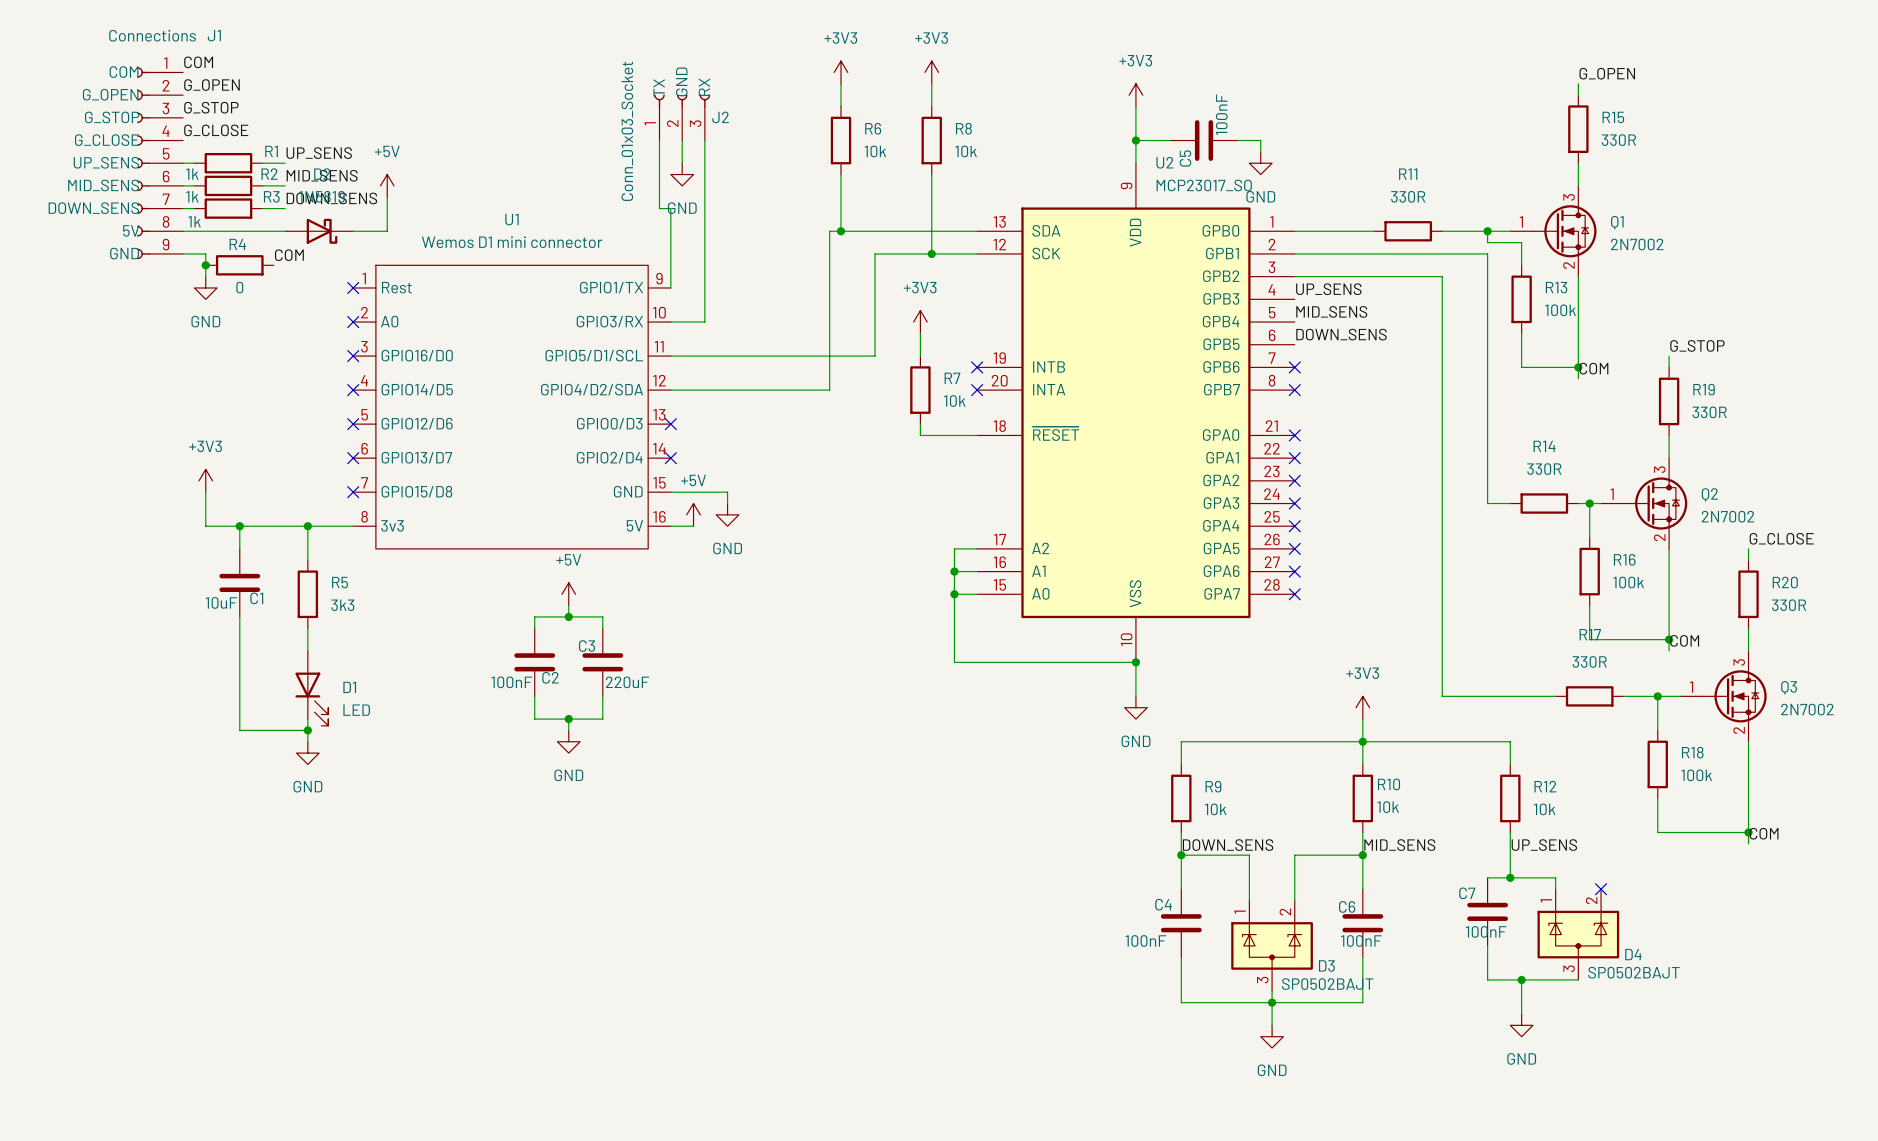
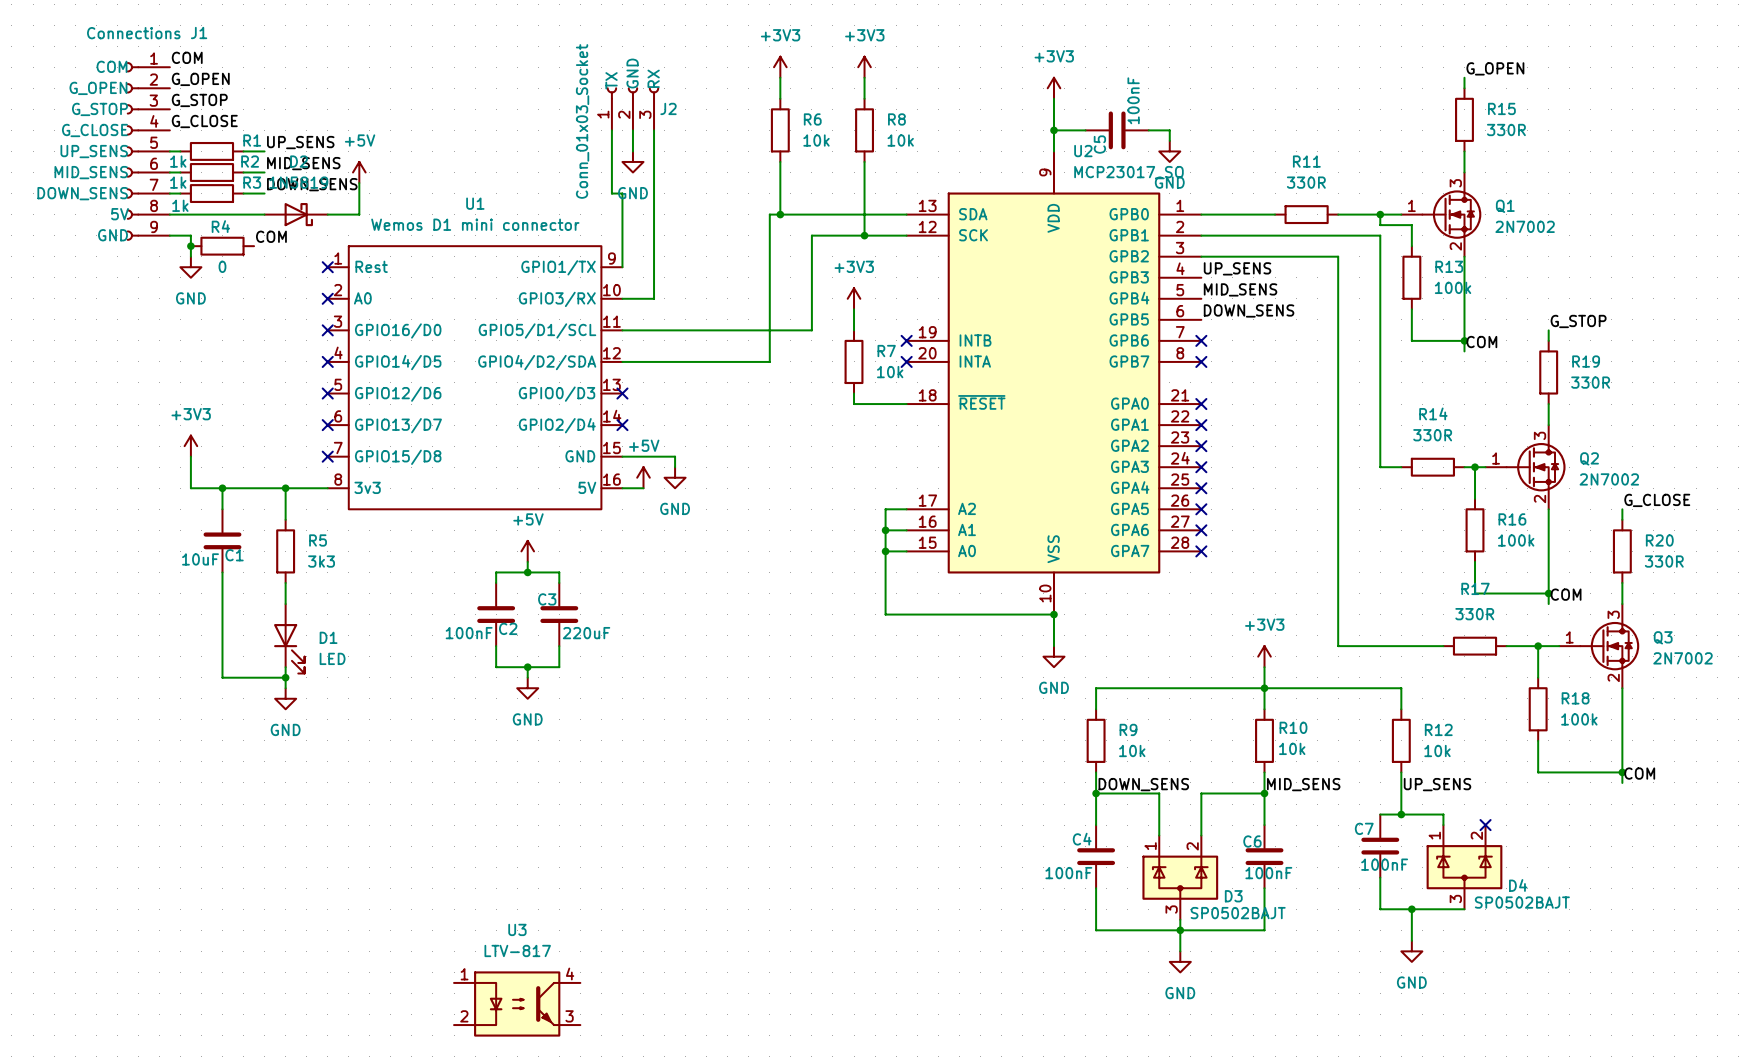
U3: none -> LTV-817 (517, 1003)

